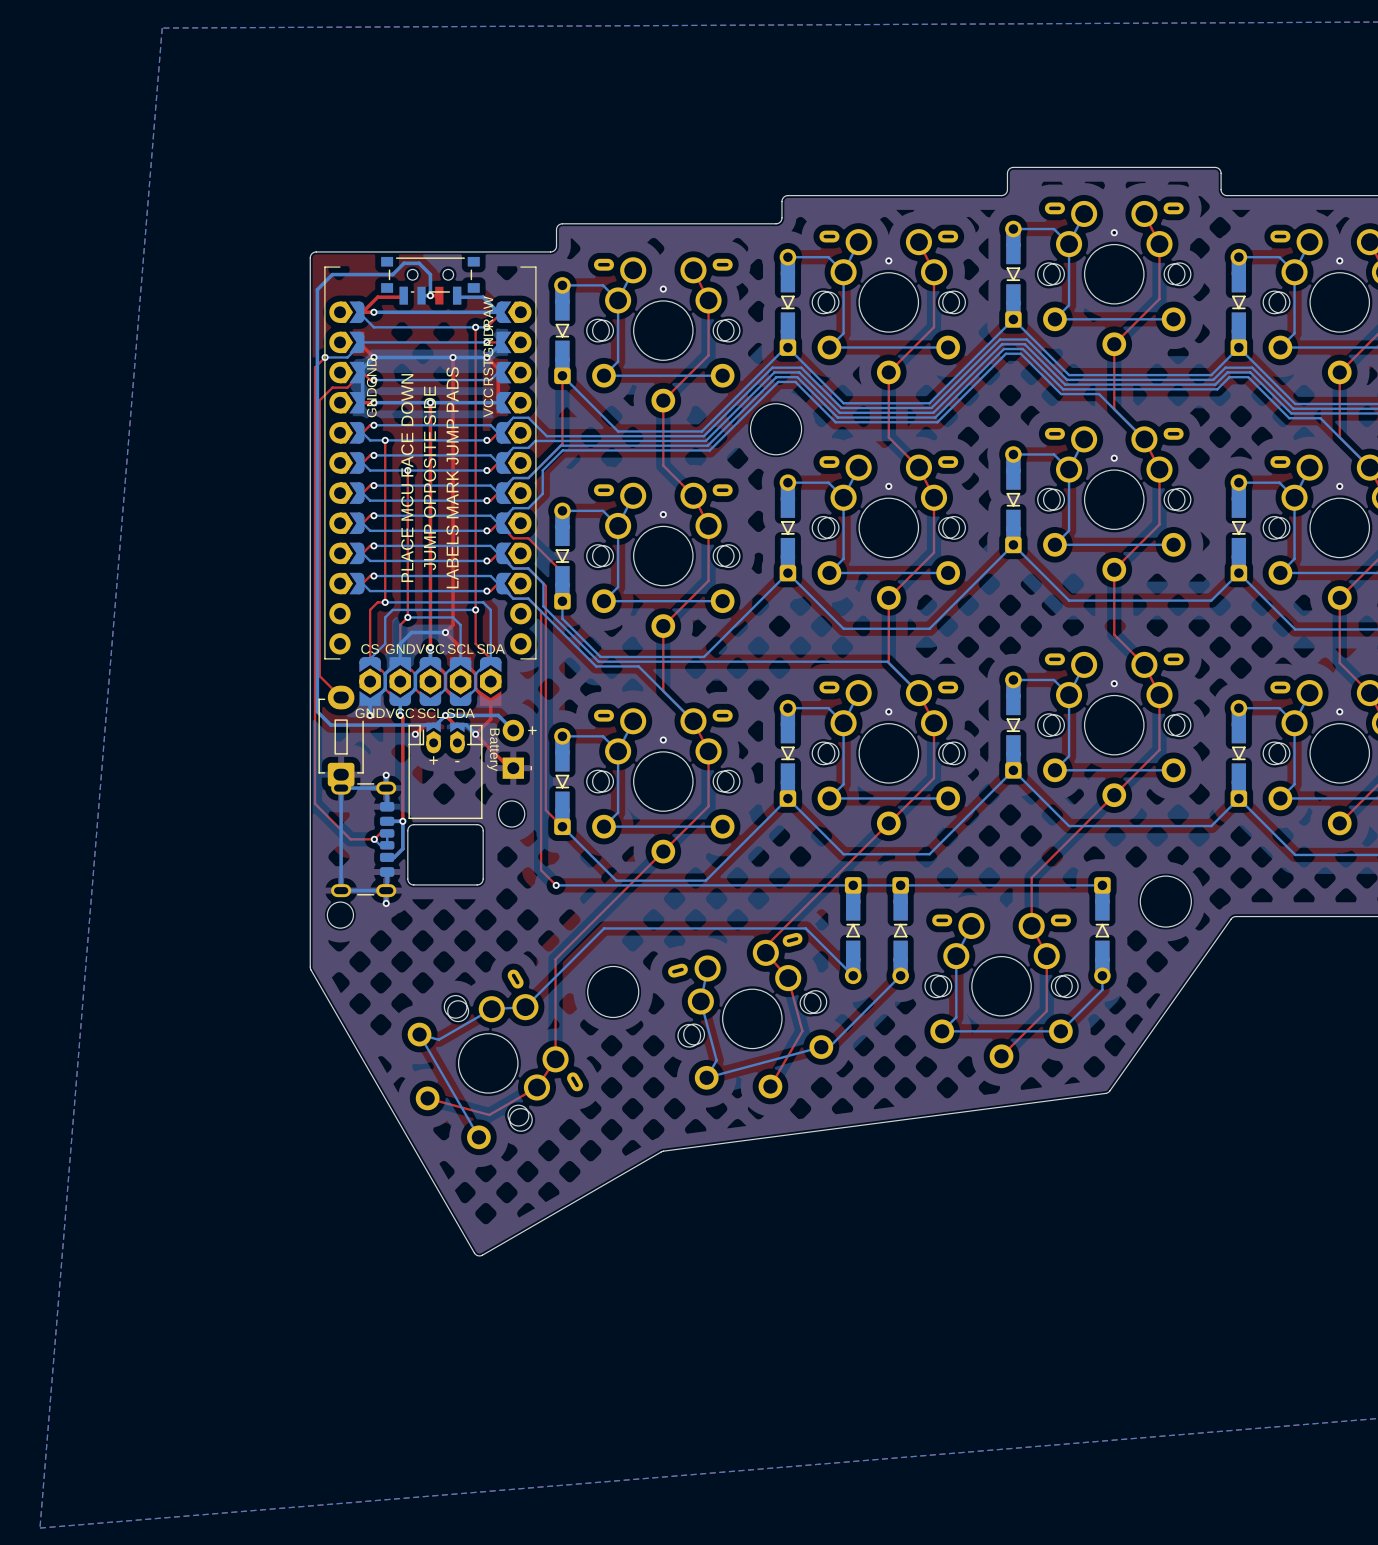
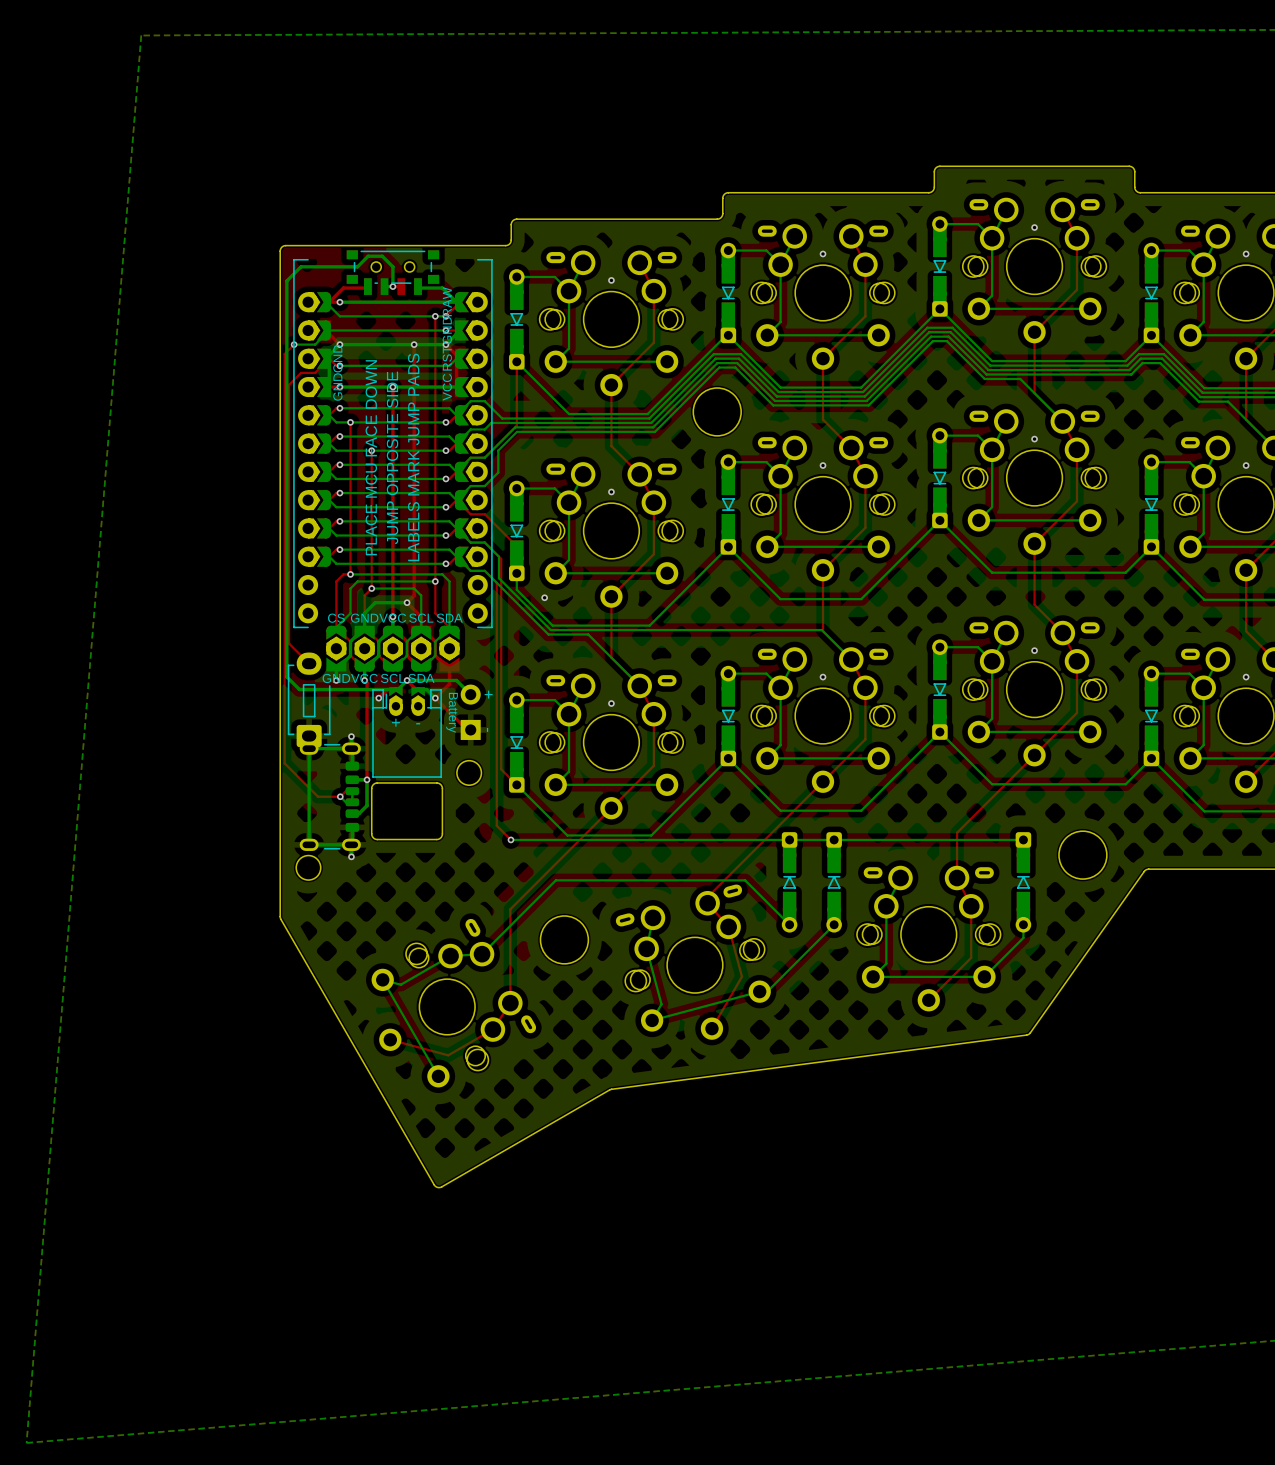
via: none -> (544, 597)

